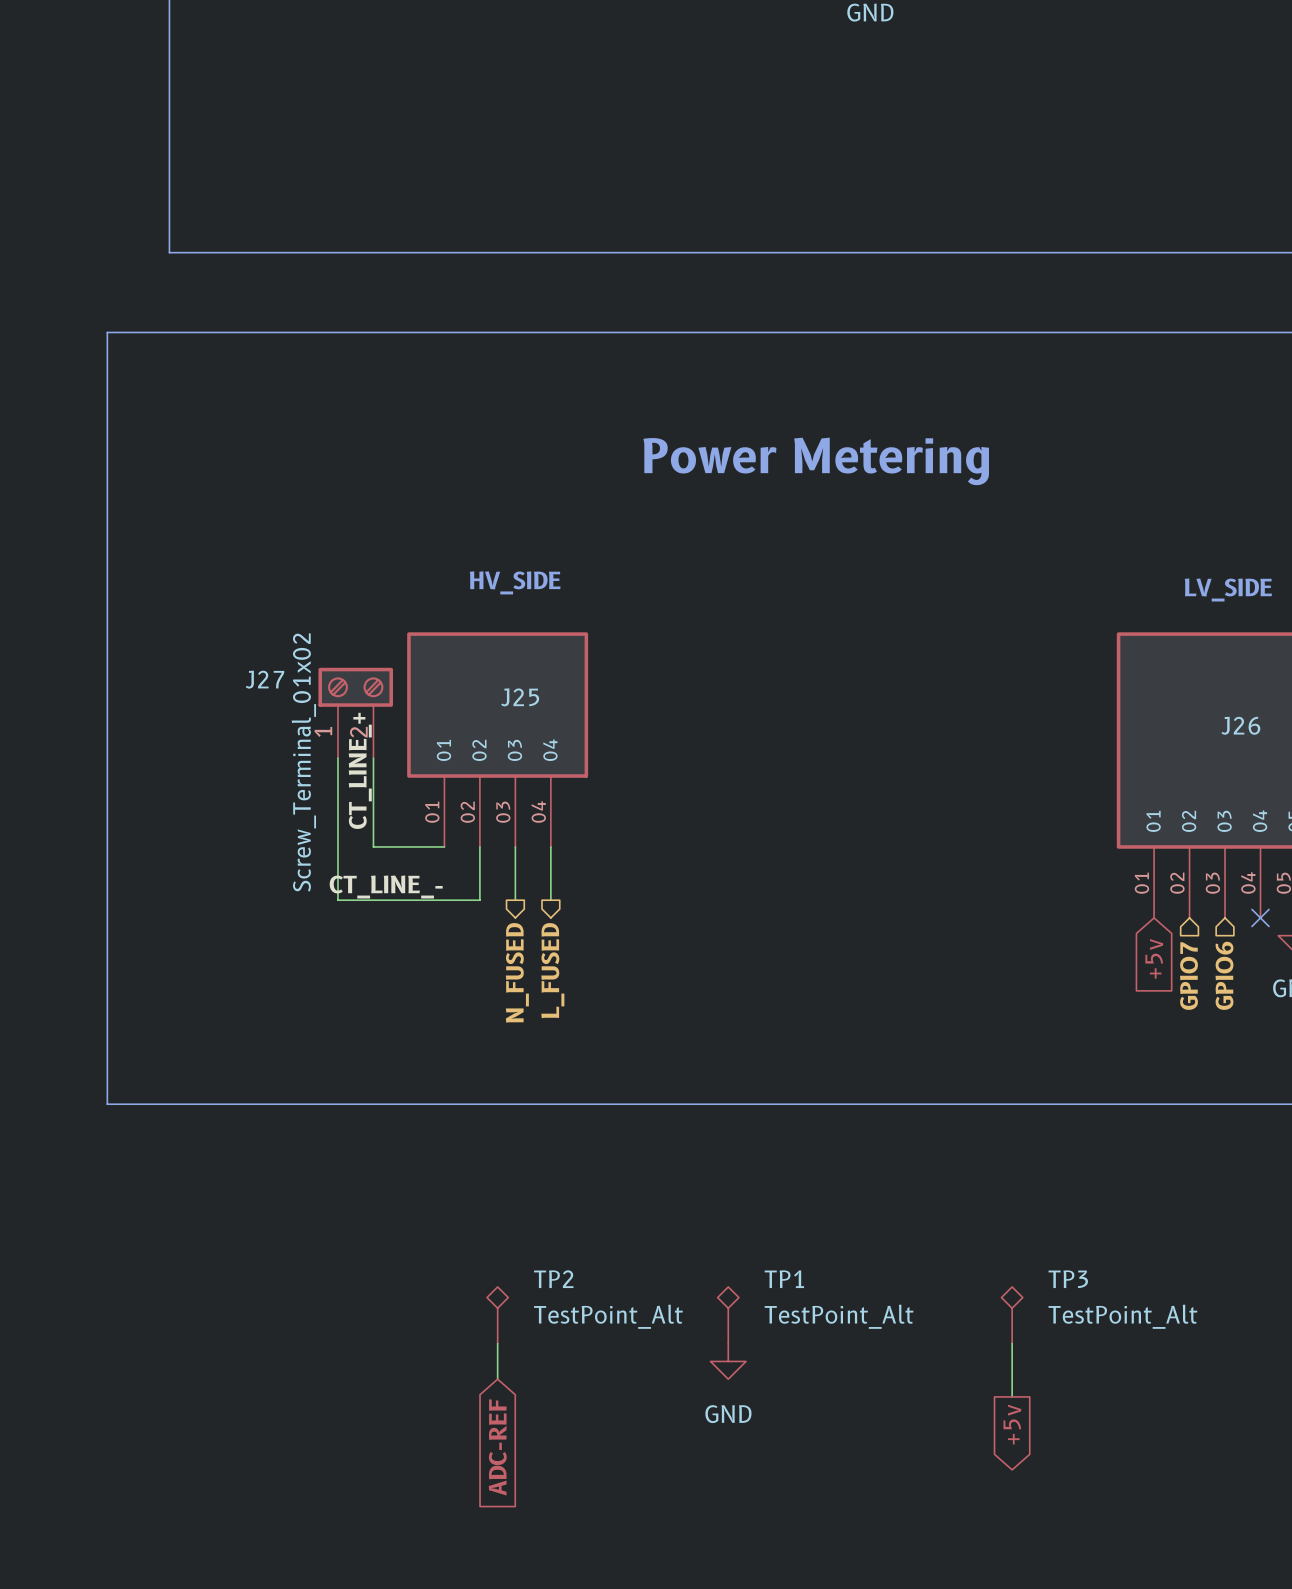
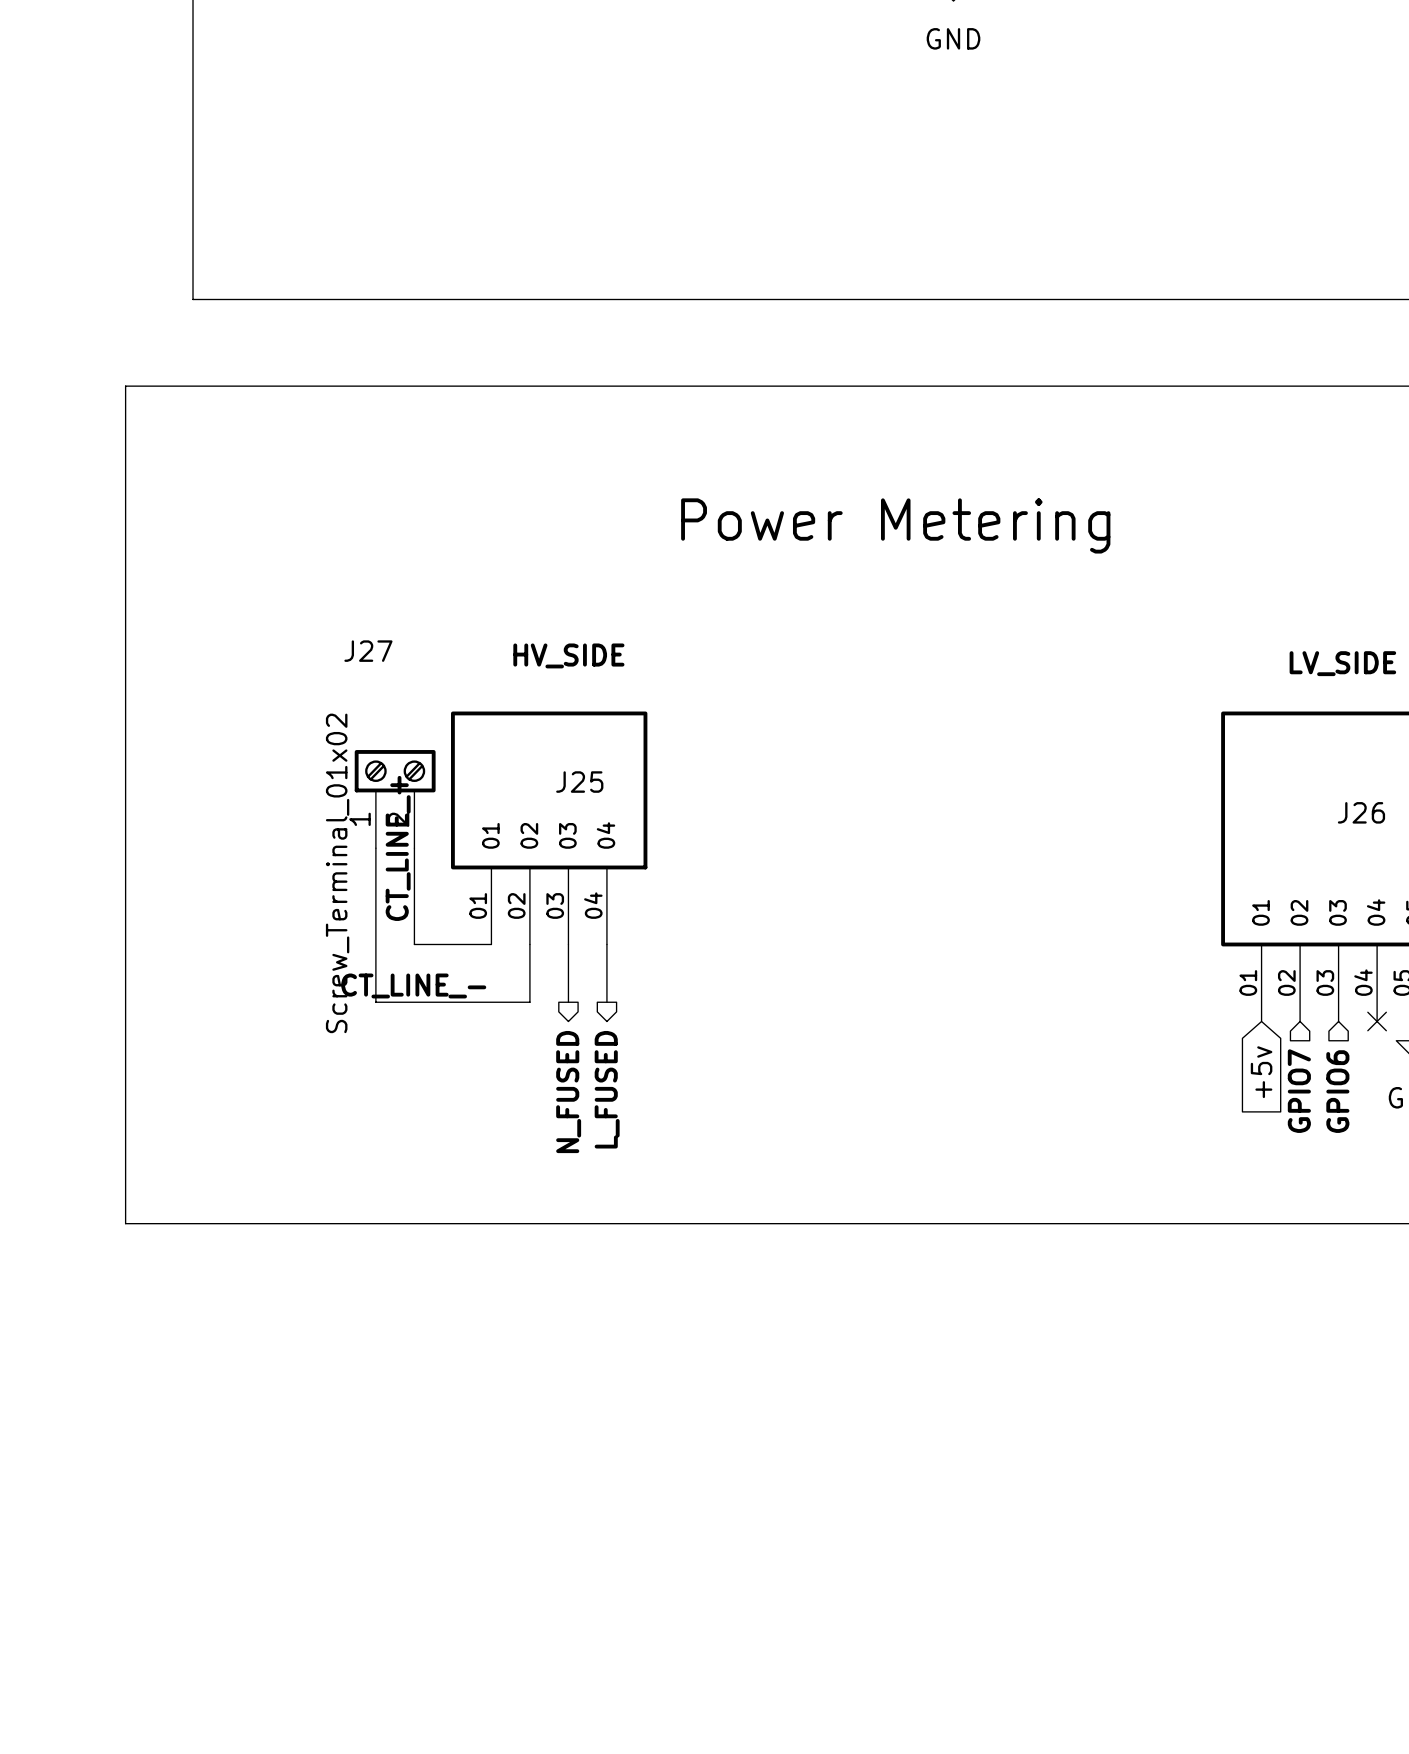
J27 name position: J27 (264, 679) -> J27 (368, 651)
TP2: TestPoint_Alt (497, 1315) -> none
TP1: TestPoint_Alt (728, 1315) -> none
TP3: TestPoint_Alt (1012, 1315) -> none
wire: (497, 1343) (497, 1379) -> none
wire: (1012, 1343) (1012, 1396) -> none
power symbol: GND (728, 1361) -> none
global label: +5v (1012, 1424) -> none
global label: ADC-REF (497, 1447) -> none

